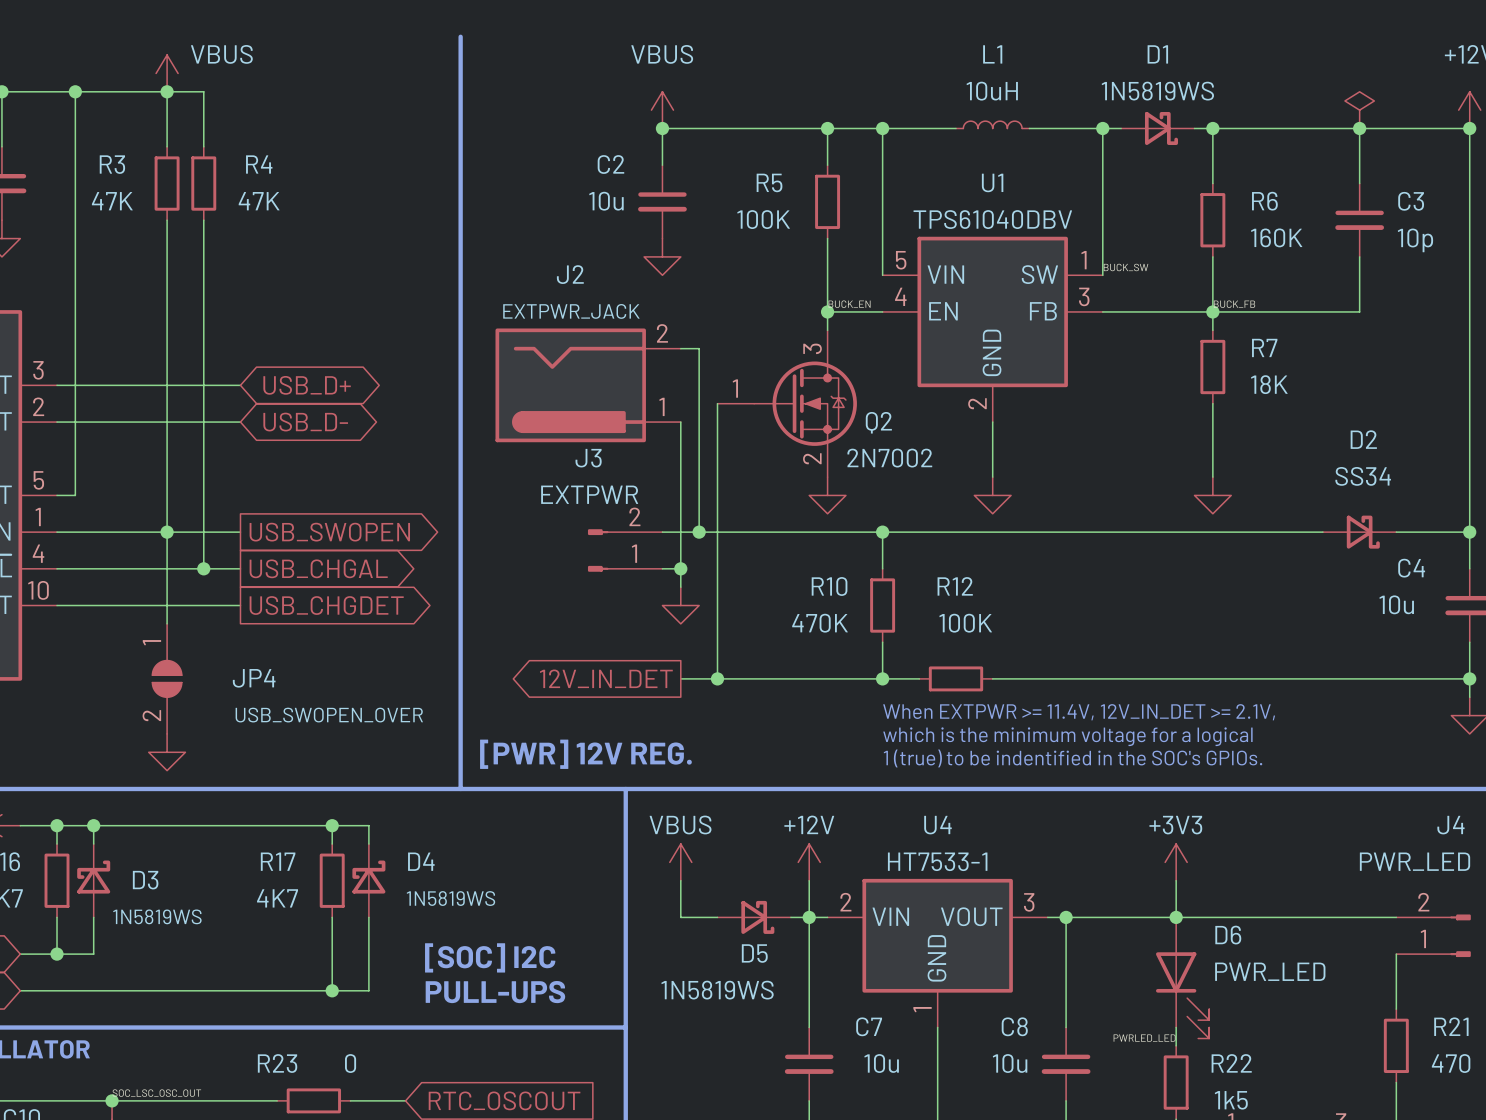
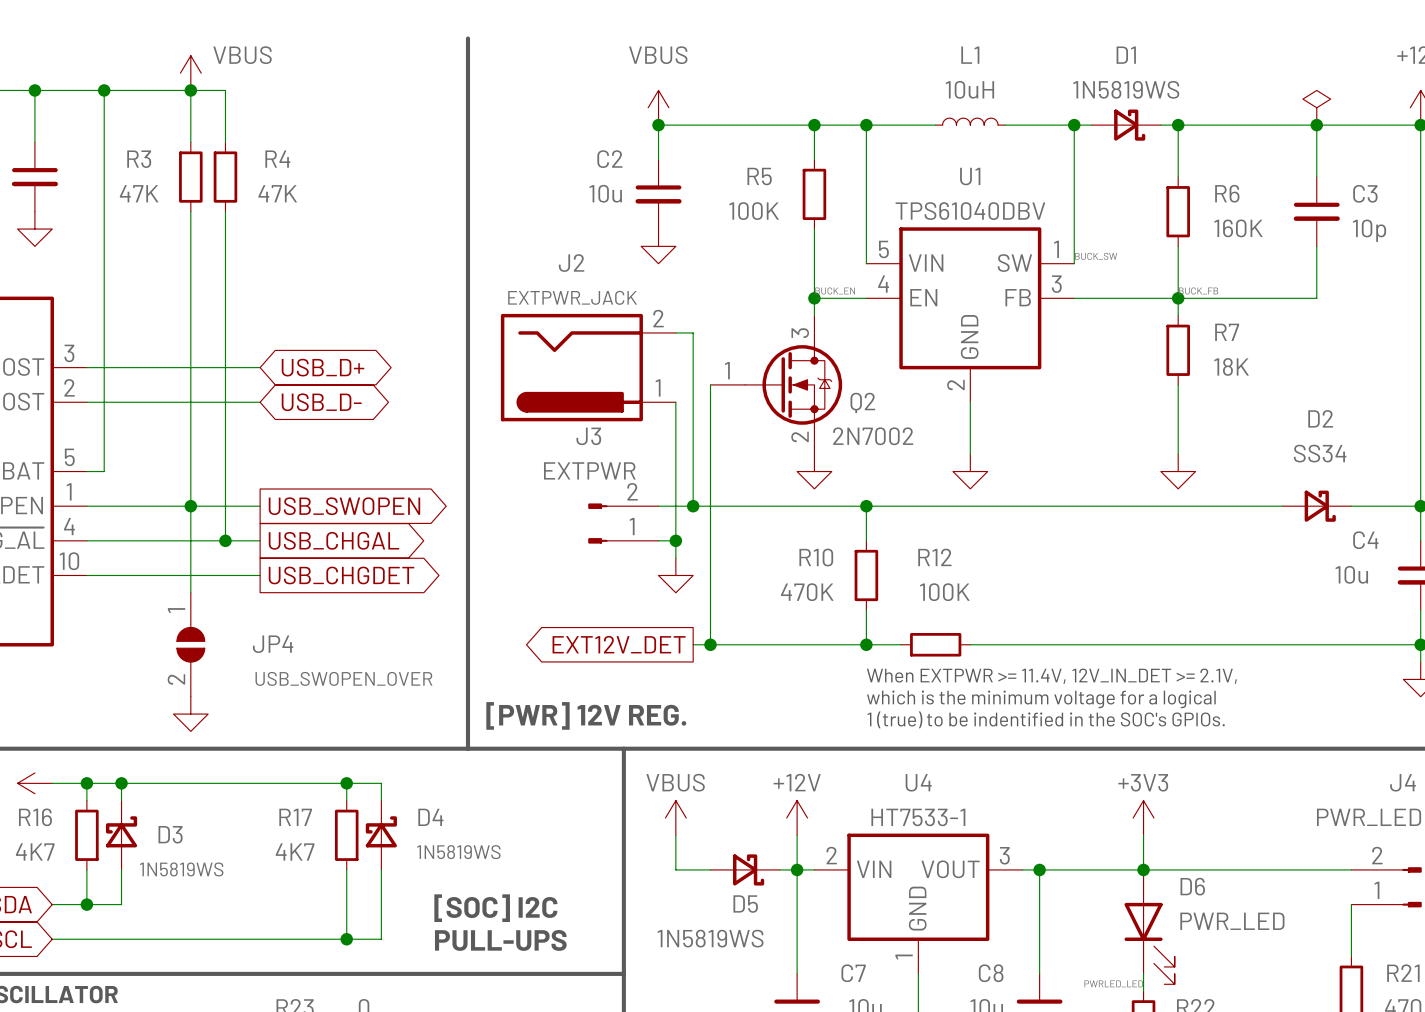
global label: 12V_IN_DET (606, 678) -> EXT12V_DET (619, 644)
wire: (680, 678) (699, 678) -> none

